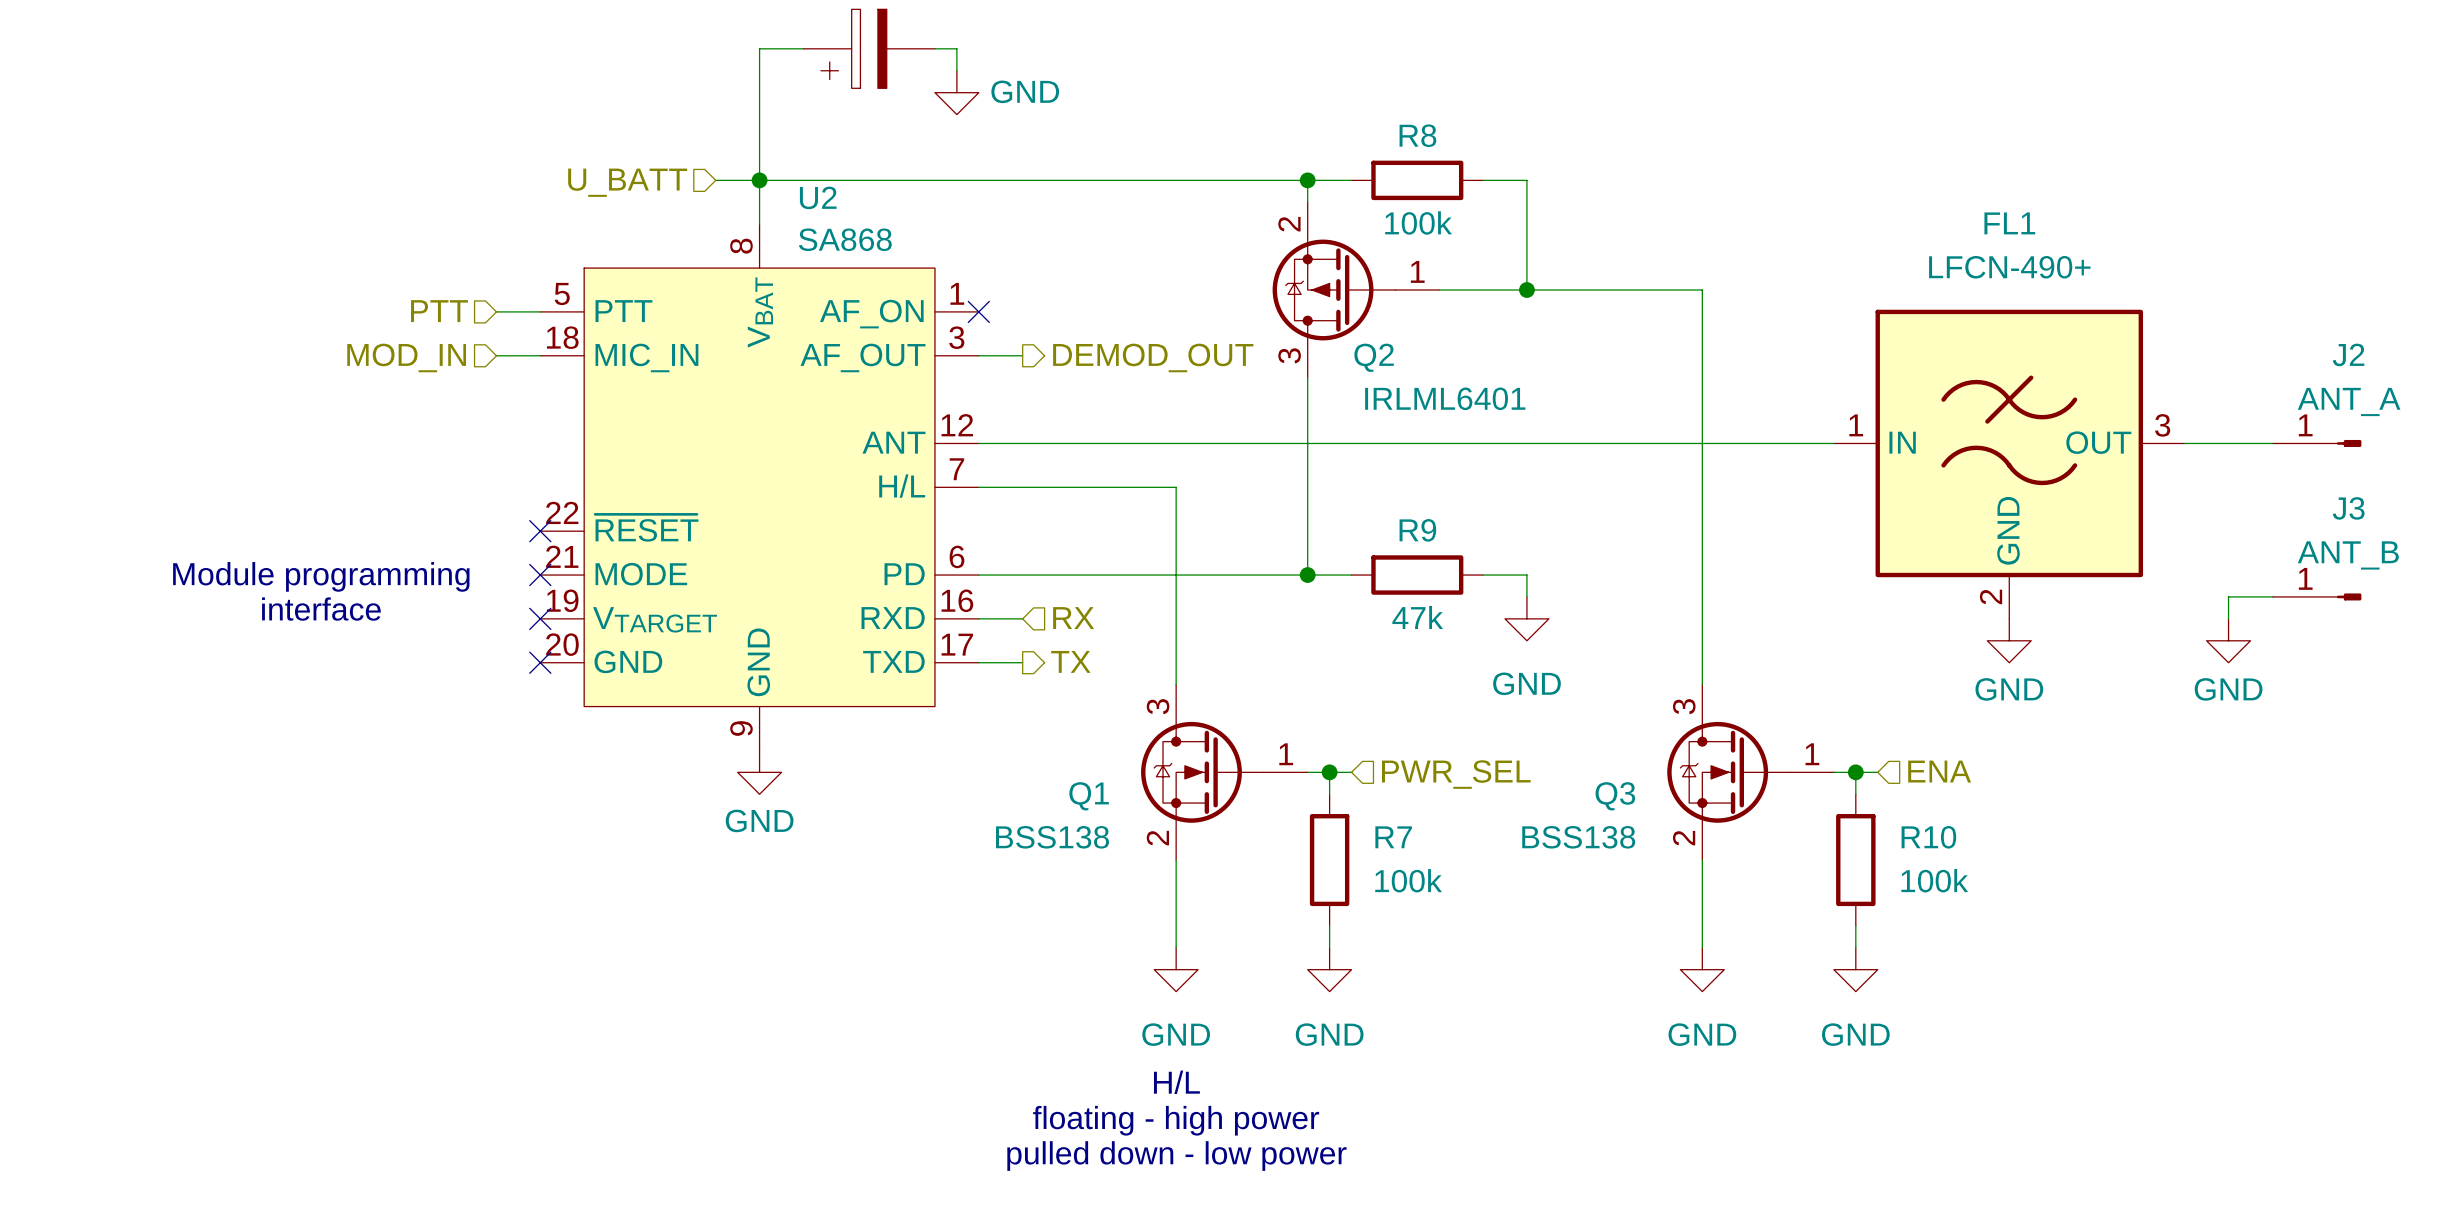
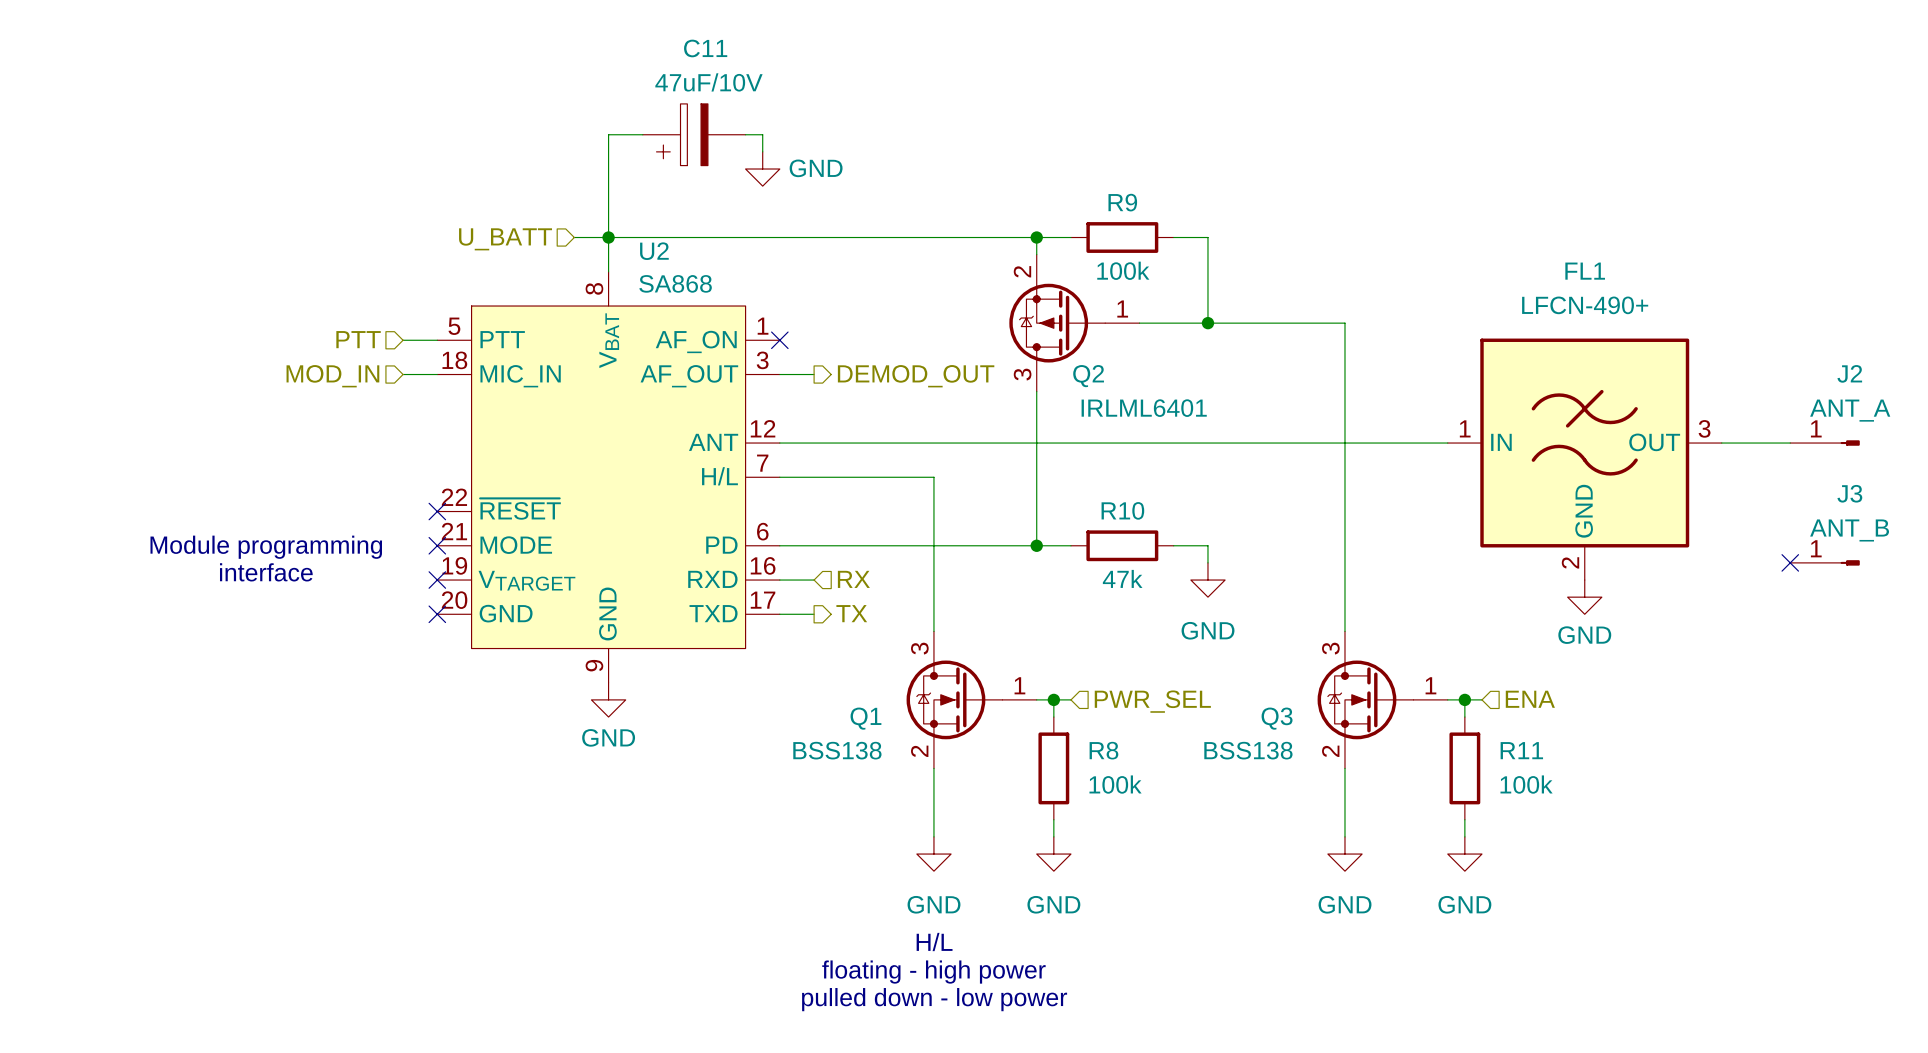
R8 name: R8 (1417, 135) -> R9 (1122, 202)
R9 name: R9 (1417, 530) -> R10 (1122, 510)
wire: (2272, 596) (2228, 596) (2228, 618) -> none
no-connect mark: none -> (1790, 562)
power symbol: GND (2228, 640) -> none
R7 name: R7 (1393, 837) -> R8 (1103, 750)
R10 name: R10 (1928, 837) -> R11 (1521, 750)

